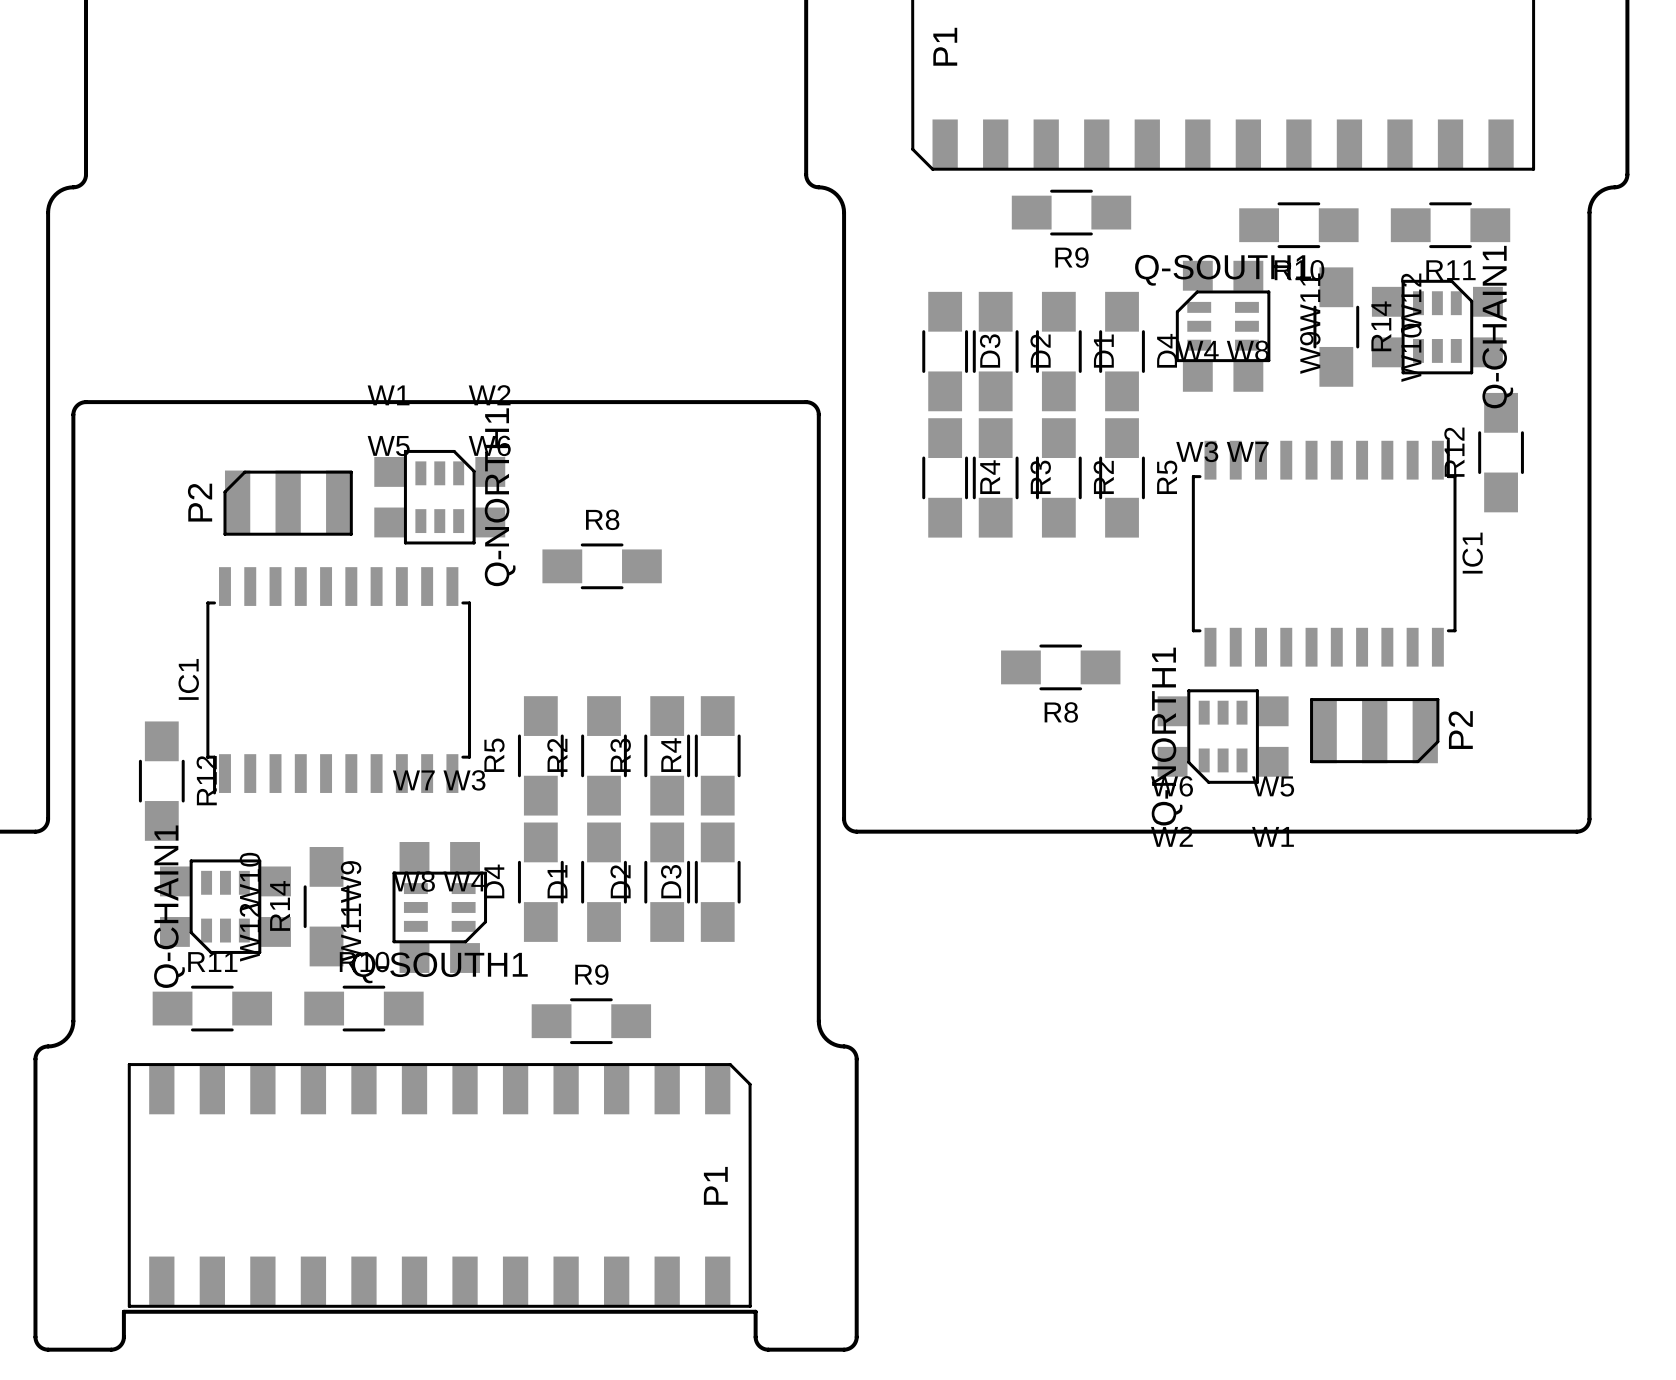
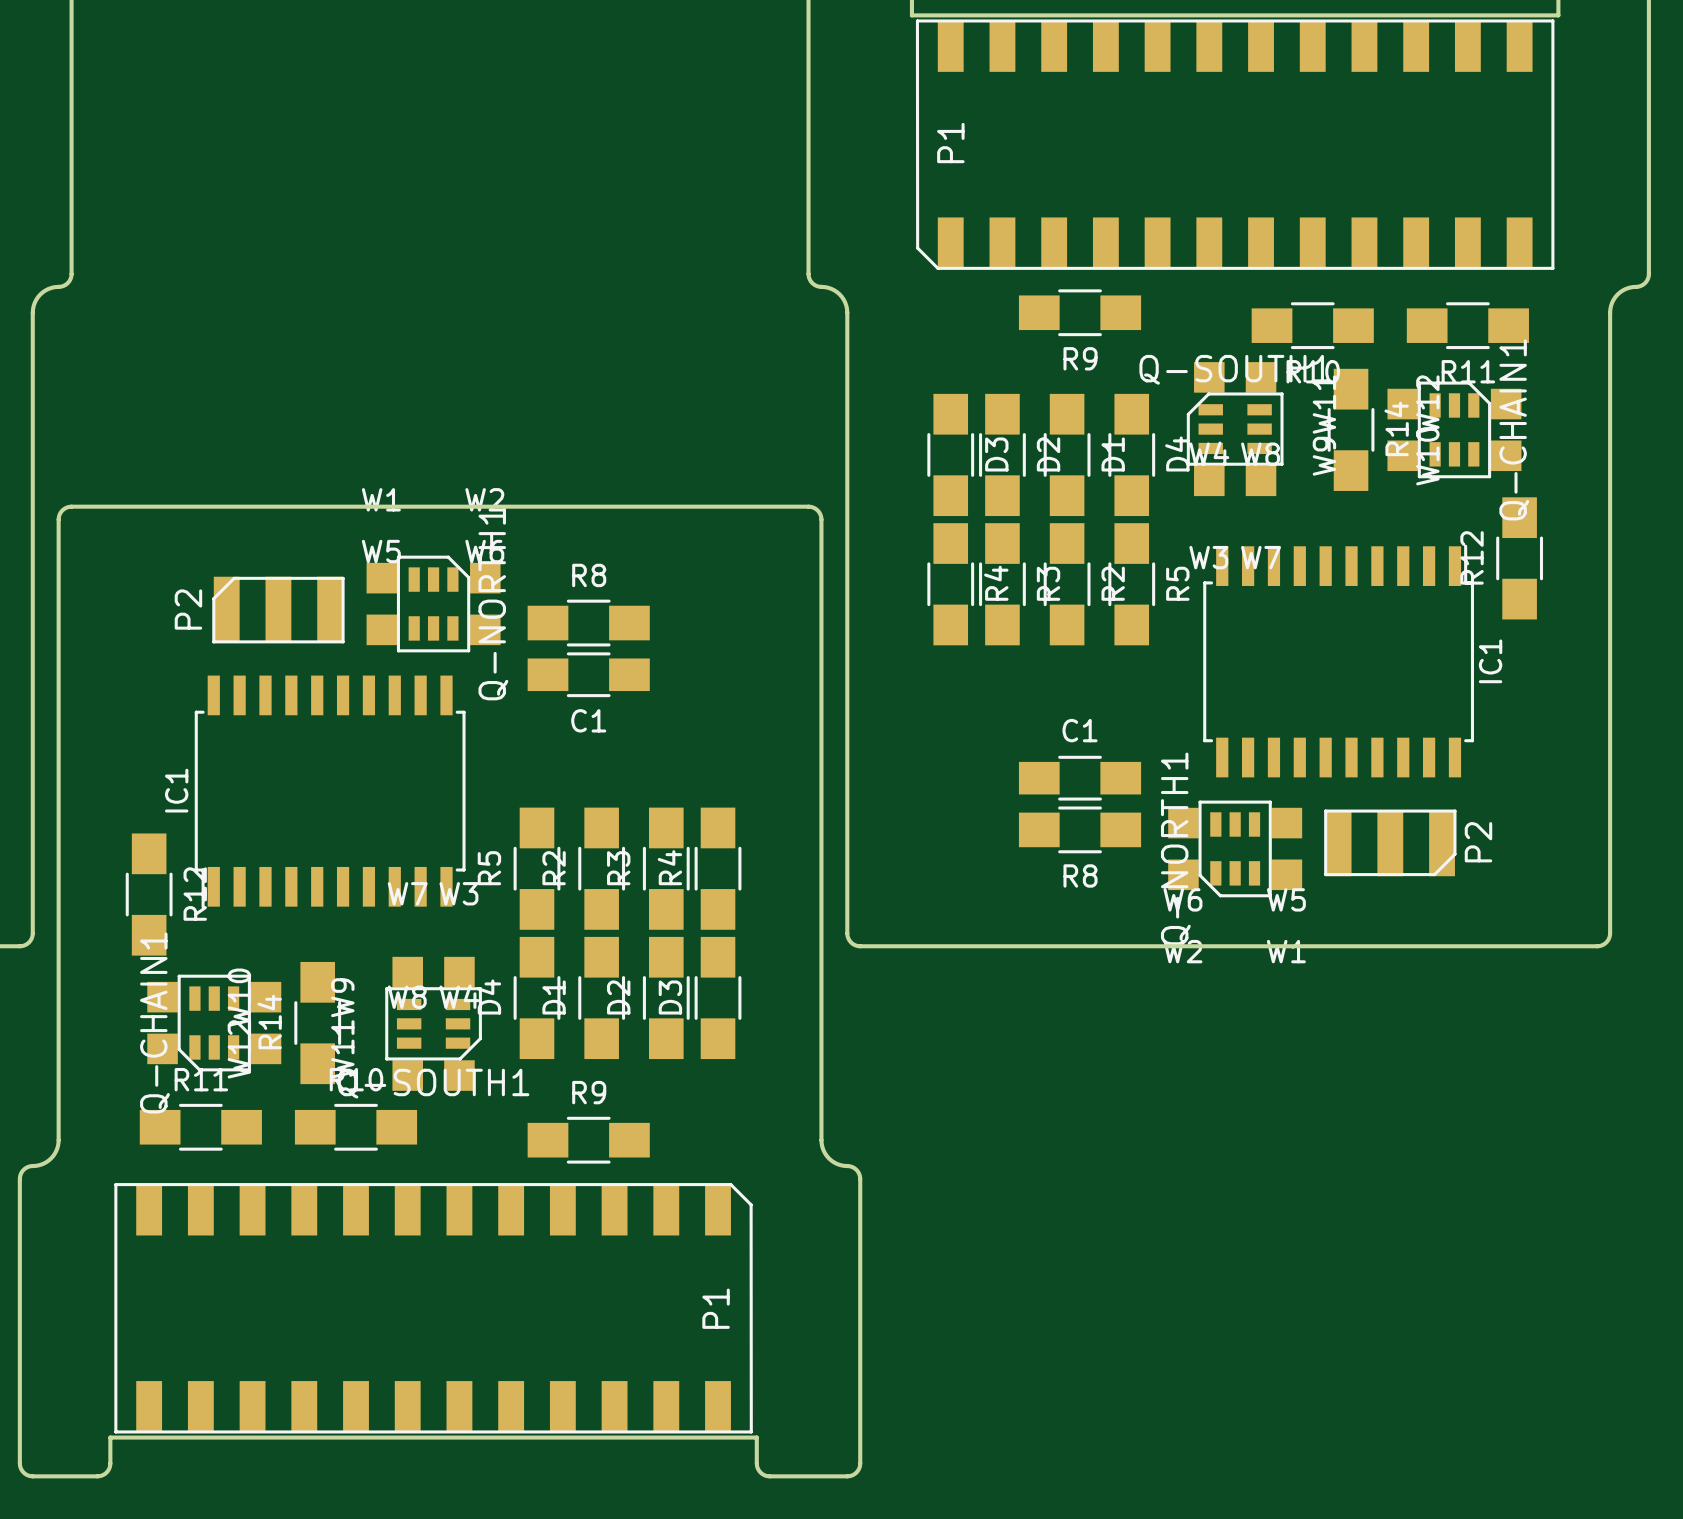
C1: none -> (588, 674)
R8 position: (602, 566) -> (588, 623)
R8 position: (1060, 667) -> (1080, 829)
C1: none -> (1080, 778)

